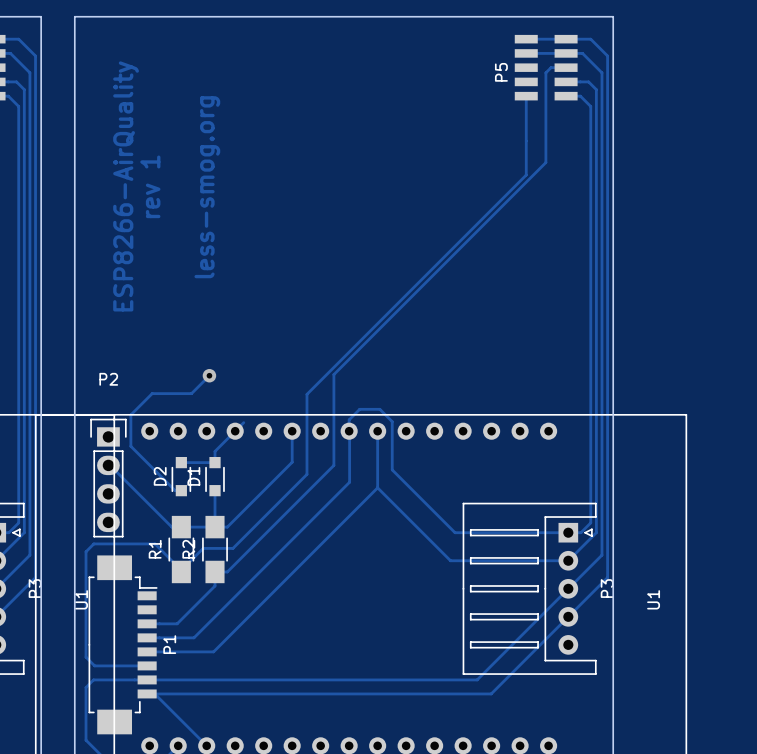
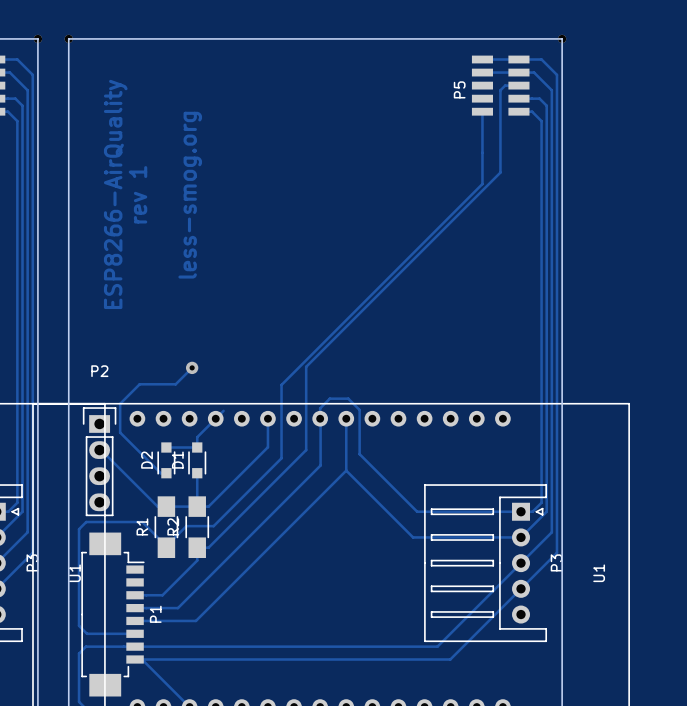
part: none -> (37, 38)
part: none -> (68, 38)
part: none -> (562, 38)

